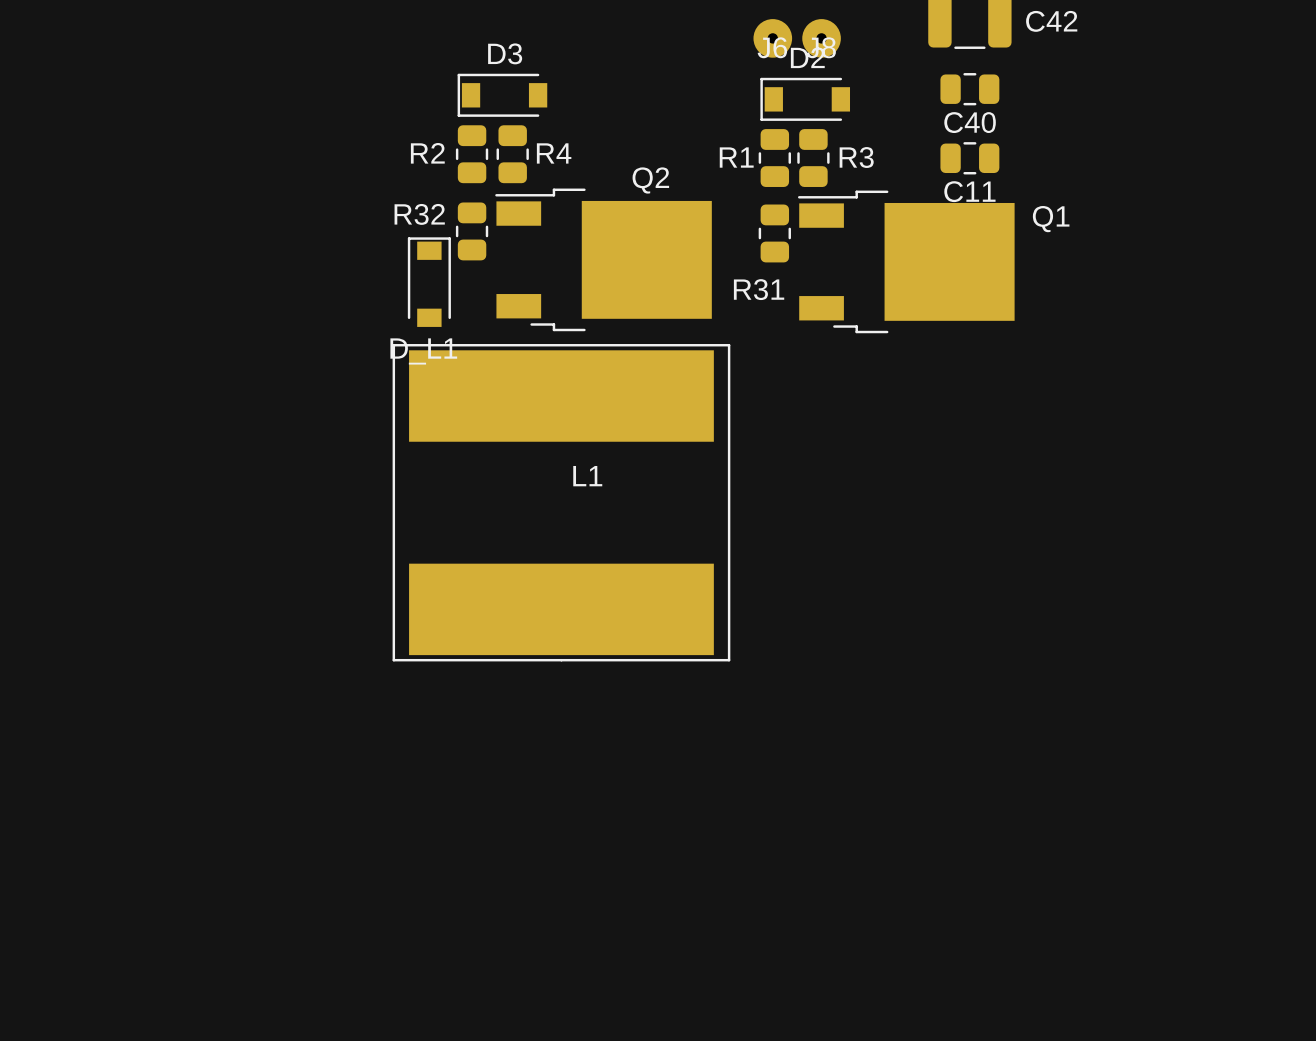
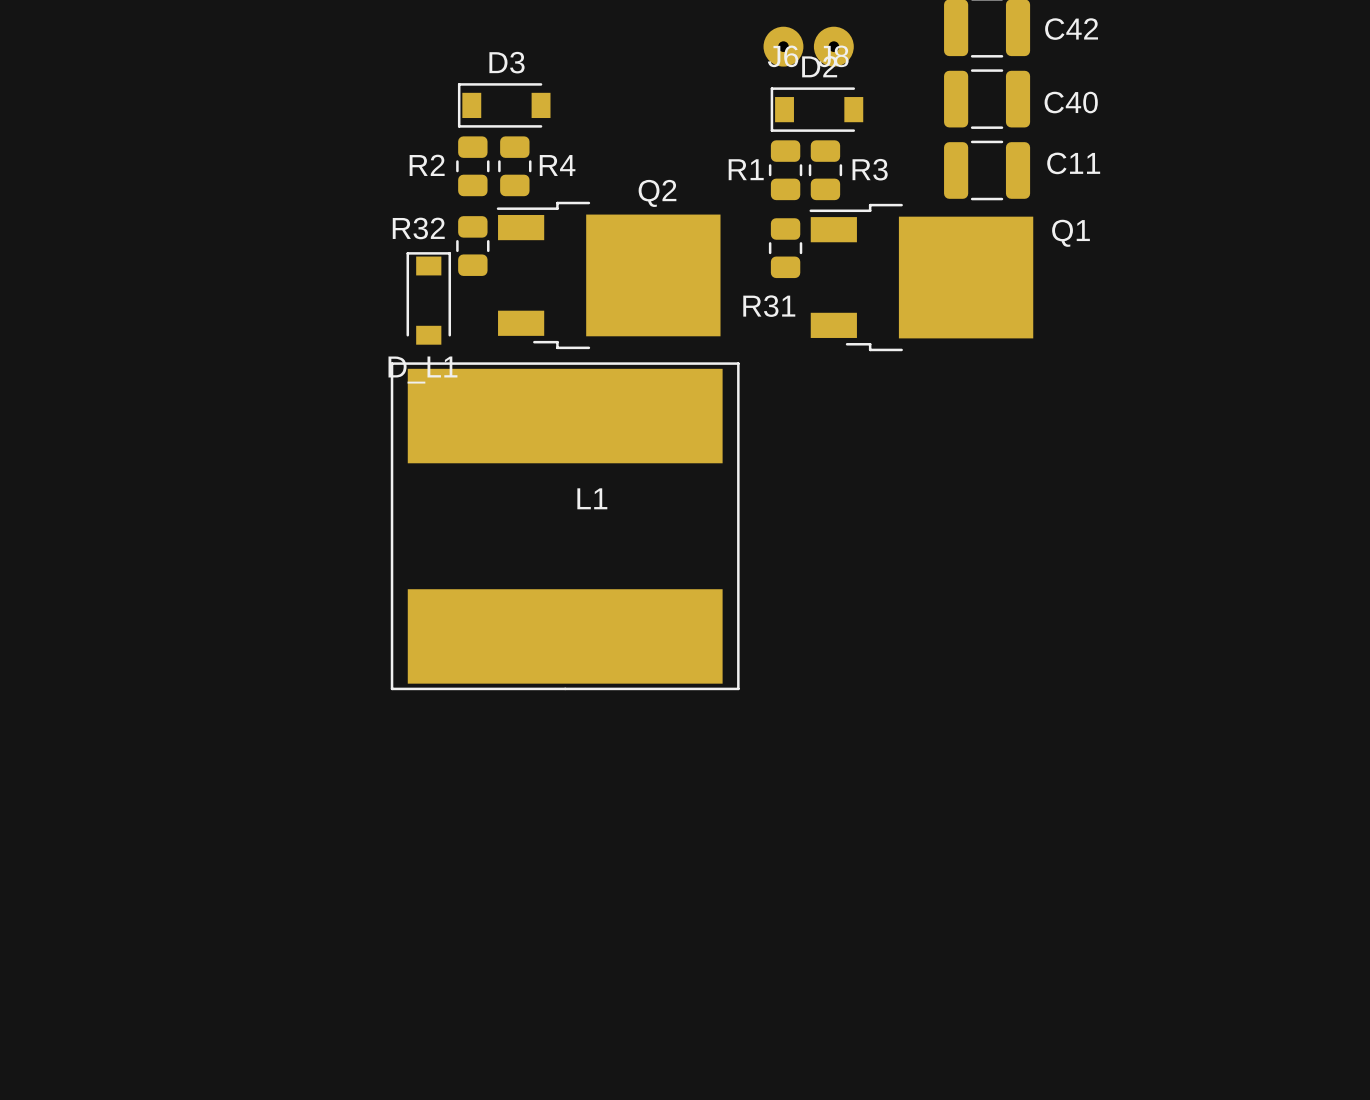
C40 footprint: [940, 73, 1000, 106] -> [944, 69, 1031, 129]
C40 name position: C40 (970, 122) -> C40 (1071, 102)
C11 footprint: [940, 142, 1000, 175] -> [944, 140, 1031, 201]
C11 name position: C11 (969, 191) -> C11 (1073, 163)

